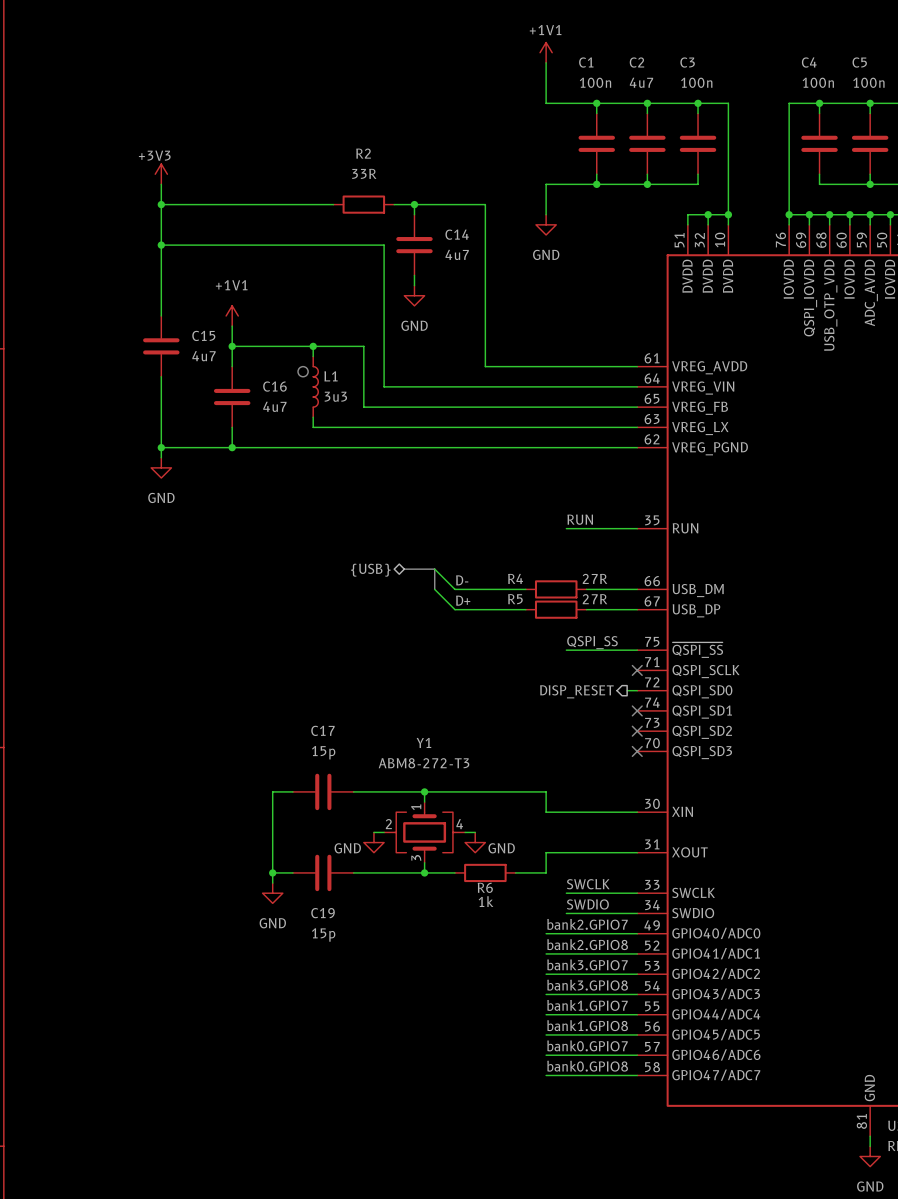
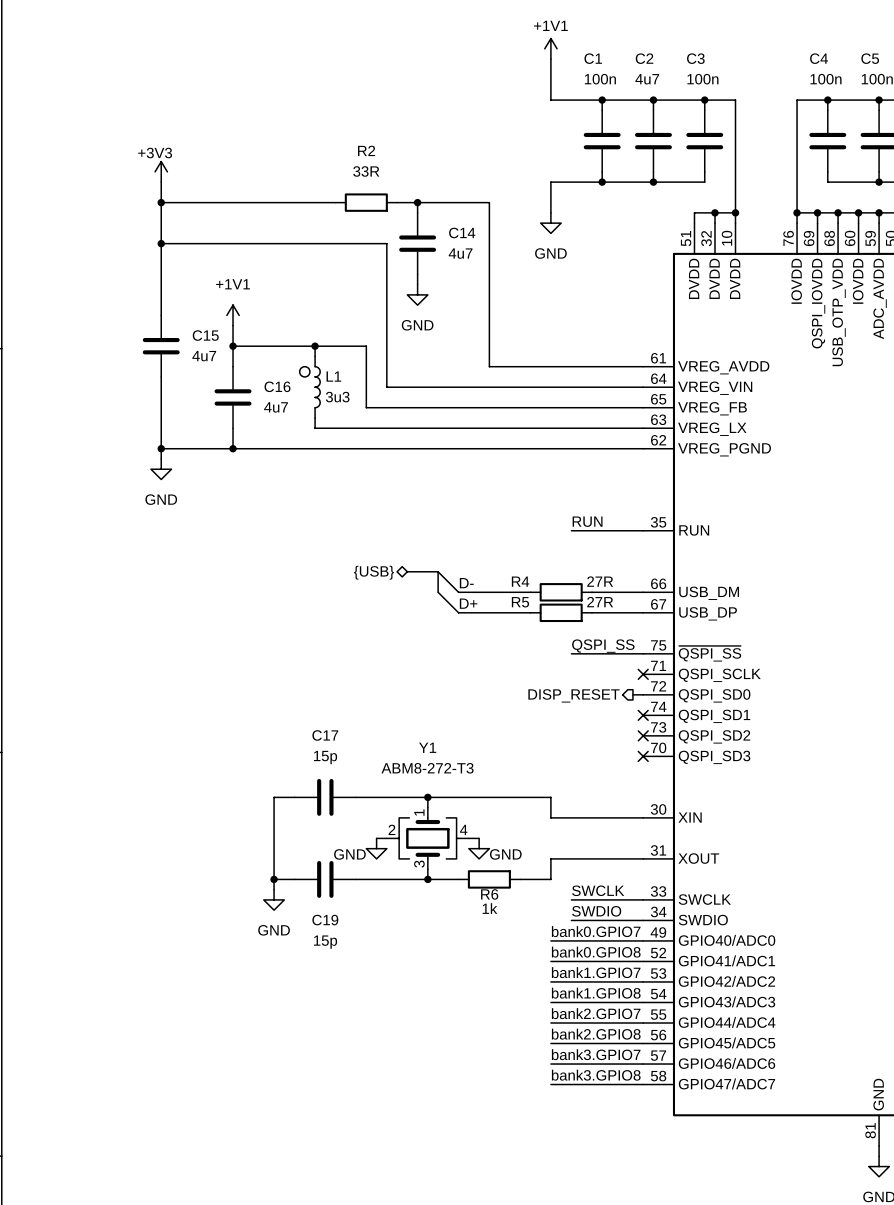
label: bank2.GPIO7 (587, 924) -> bank0.GPIO7 (596, 931)
label: bank2.GPIO8 (587, 944) -> bank0.GPIO8 (596, 952)
label: bank3.GPIO7 (587, 964) -> bank1.GPIO7 (596, 972)
label: bank3.GPIO8 (587, 985) -> bank1.GPIO8 (596, 993)
label: bank1.GPIO7 (587, 1005) -> bank2.GPIO7 (596, 1013)
label: bank1.GPIO8 (587, 1025) -> bank2.GPIO8 (596, 1034)
label: bank0.GPIO7 (587, 1045) -> bank3.GPIO7 (596, 1054)
label: bank0.GPIO8 (587, 1066) -> bank3.GPIO8 (596, 1075)

